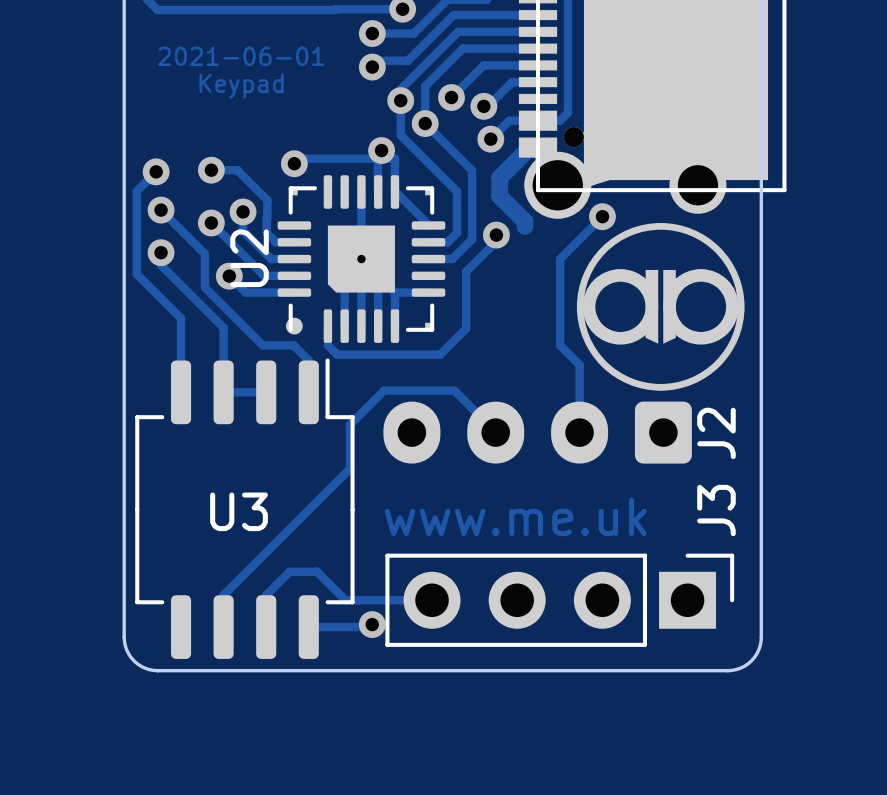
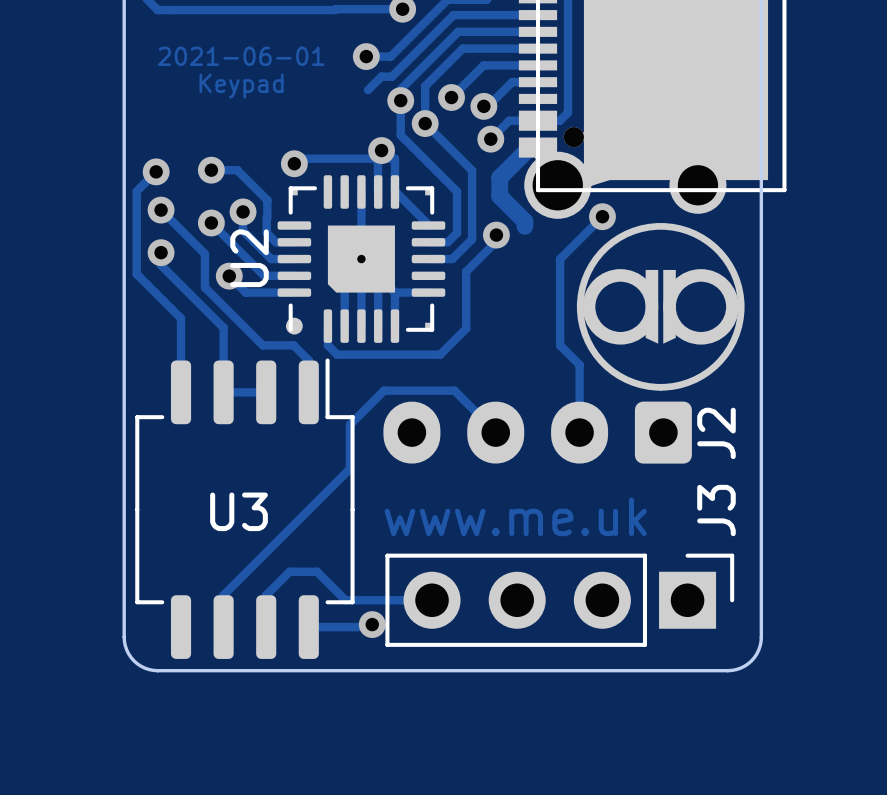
track: (372, 33) (413, 33) -> (366, 56) (390, 56) (413, 33)
via: (372, 33) -> none
via: none -> (366, 56)
track: (407, 60) (378, 60) (372, 67) -> (407, 60) (392, 76) (381, 76) (368, 90)
via: (372, 67) -> none

